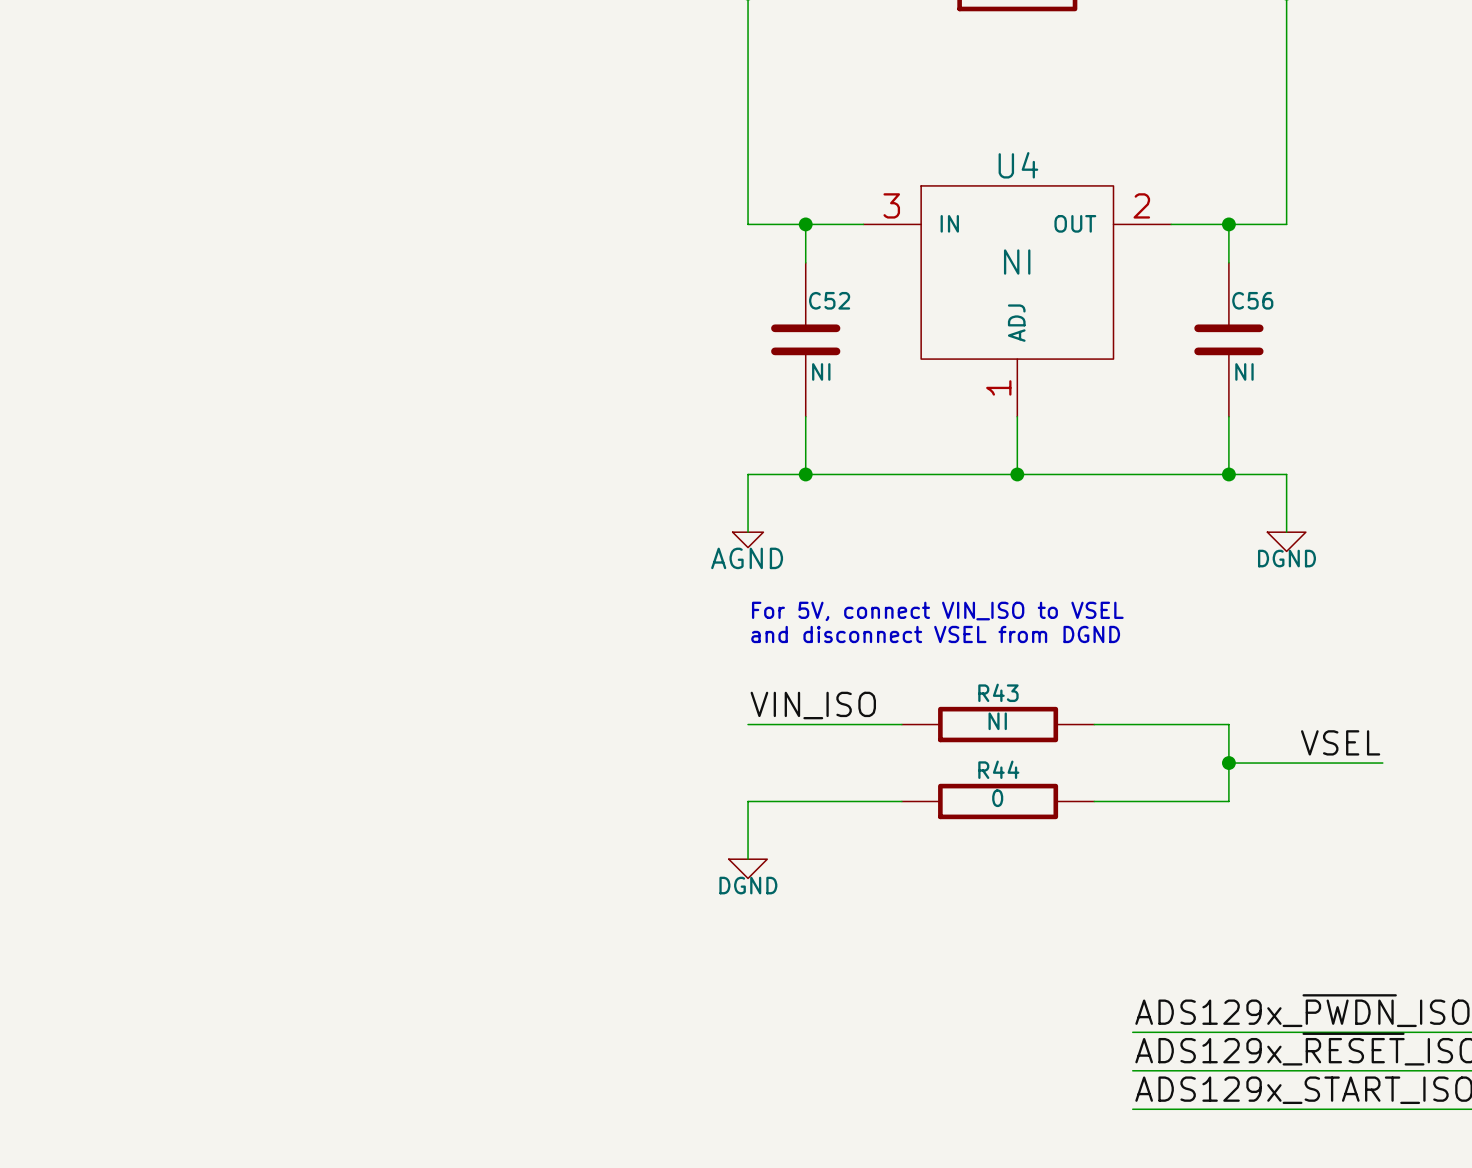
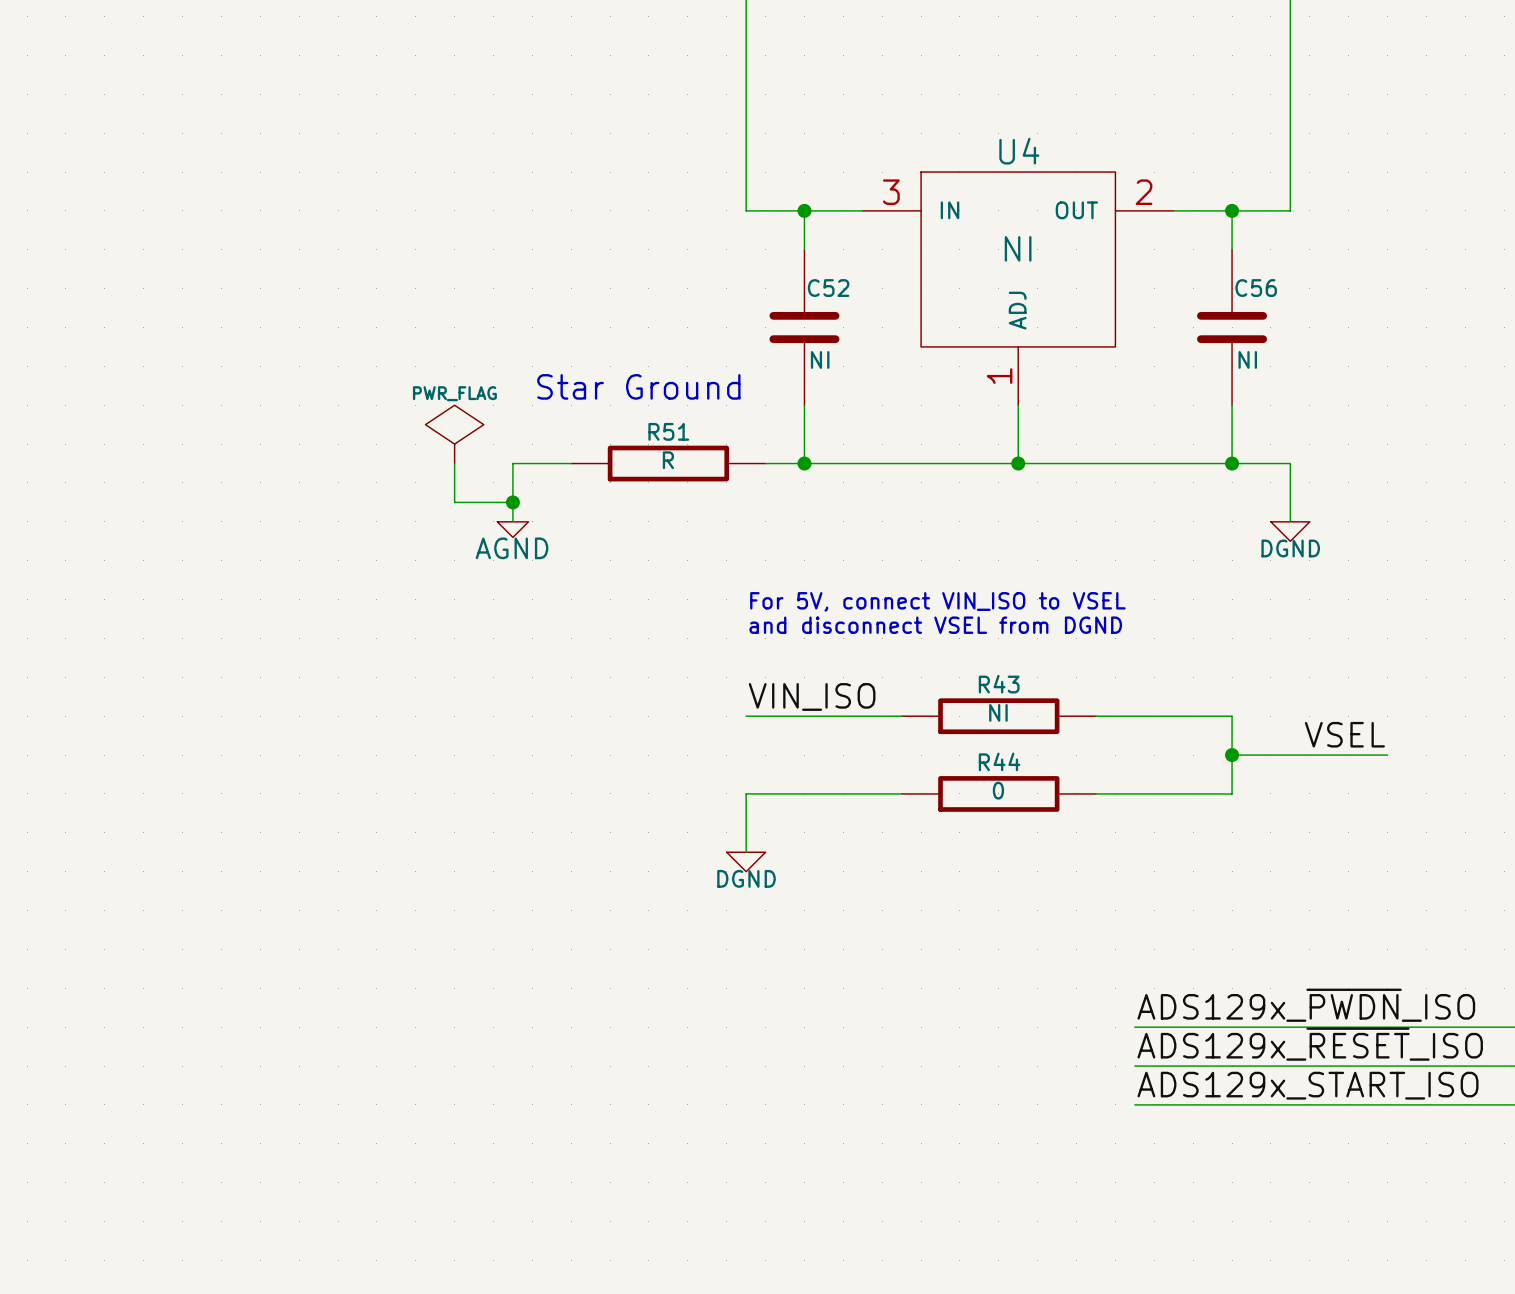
text: none -> Star Ground (638, 386)
power symbol: none -> PWR_FLAG (454, 434)
wire: none -> (454, 463) (454, 502) (512, 502)
wire: none -> (571, 463) (512, 463) (512, 521)
R51: none -> R (668, 463)
wire: (767, 474) (748, 474) (748, 532) -> none
junction: none -> (512, 502)
power symbol position: AGND (748, 539) -> AGND (512, 529)

